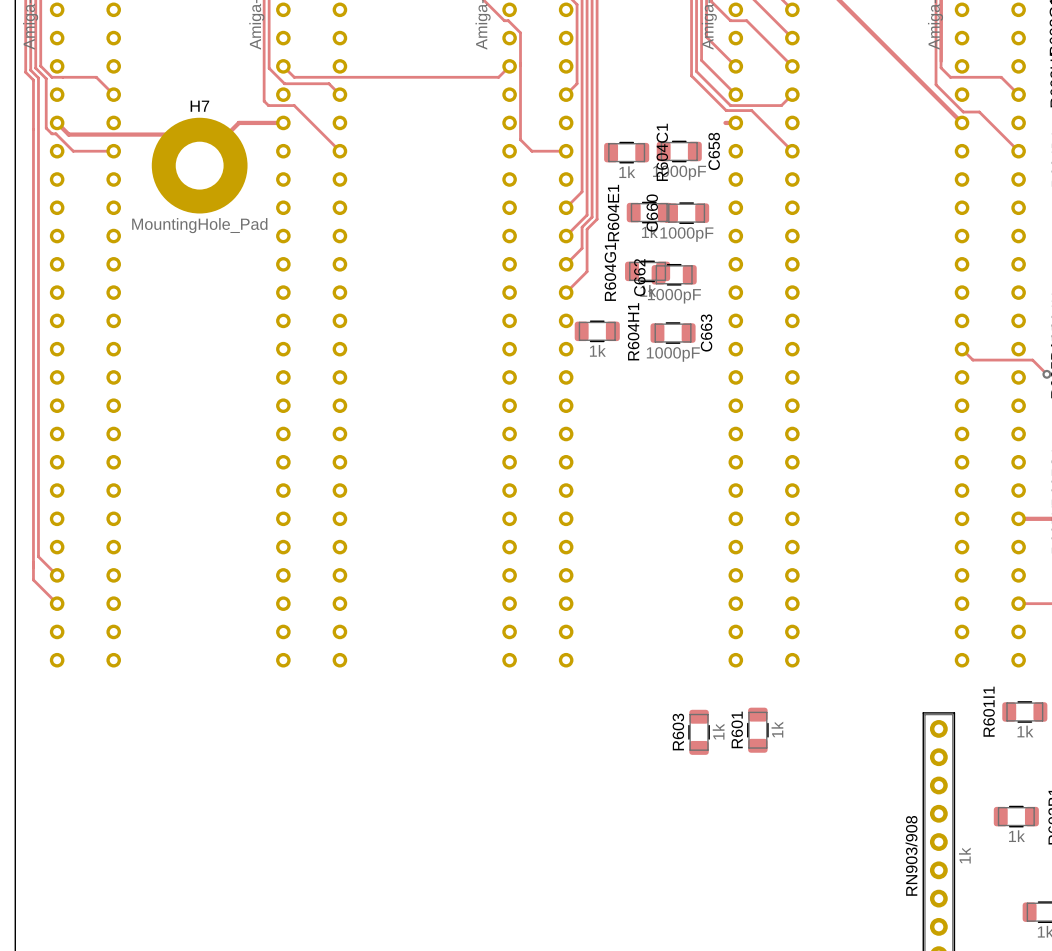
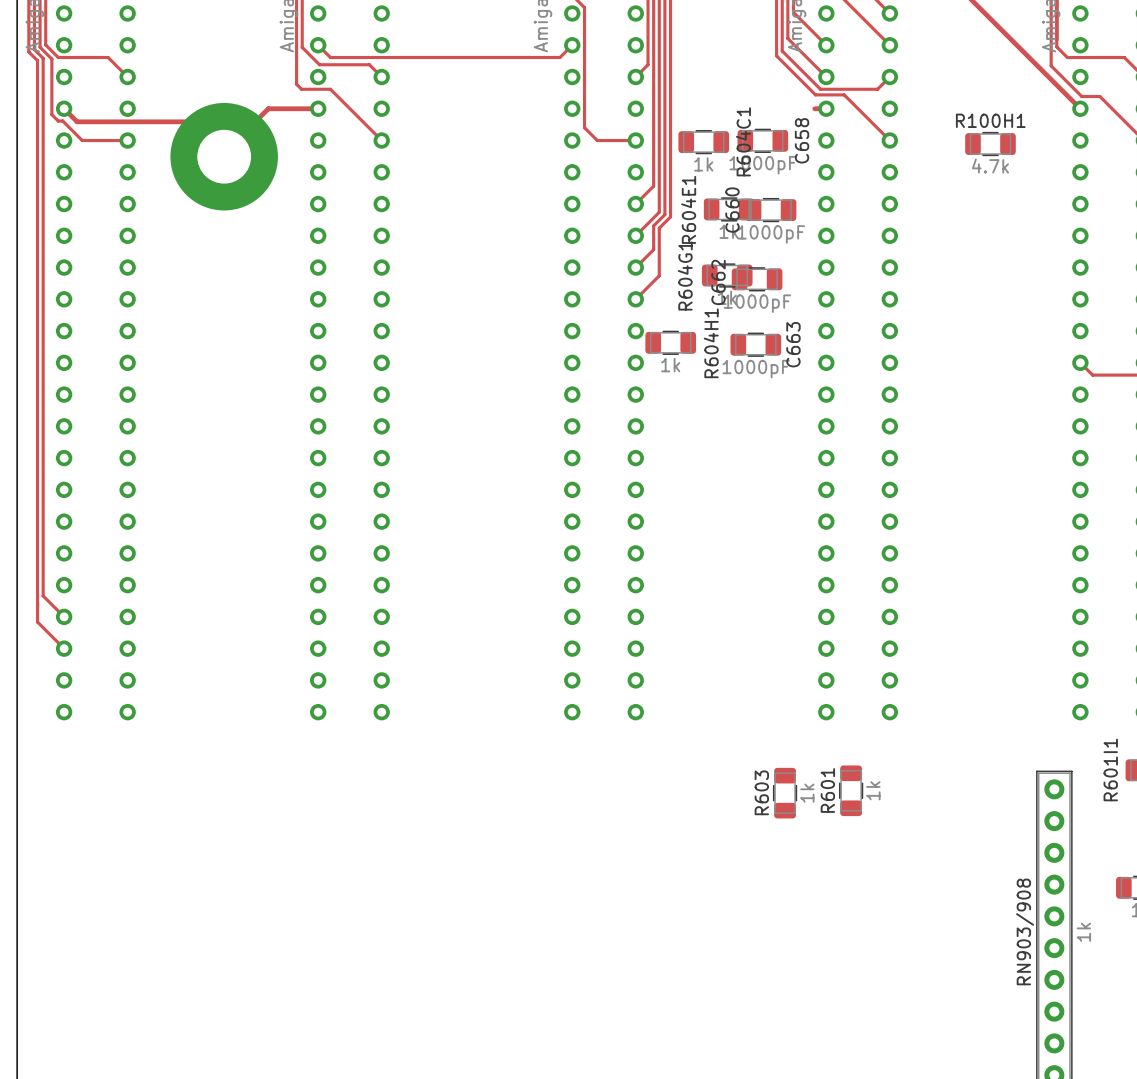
H7 name: H7 (199, 106) -> none
R100H1: none -> 4.7k (990, 144)
H7 value: MountingHole_Pad (199, 225) -> none

